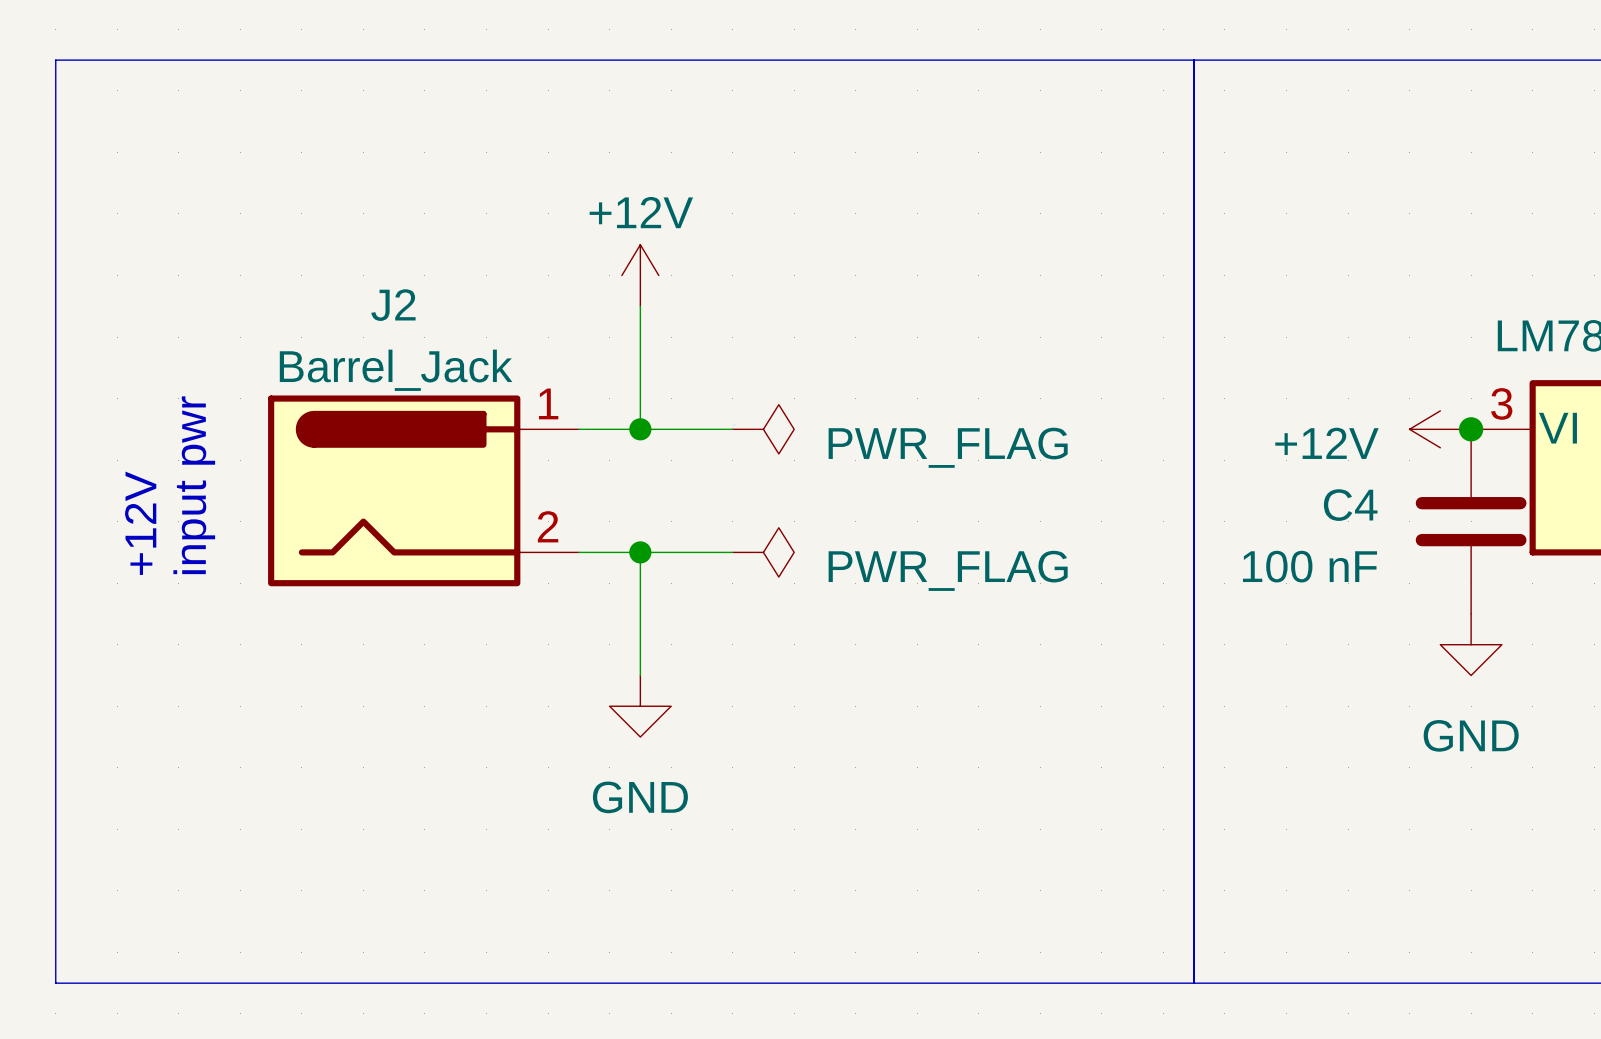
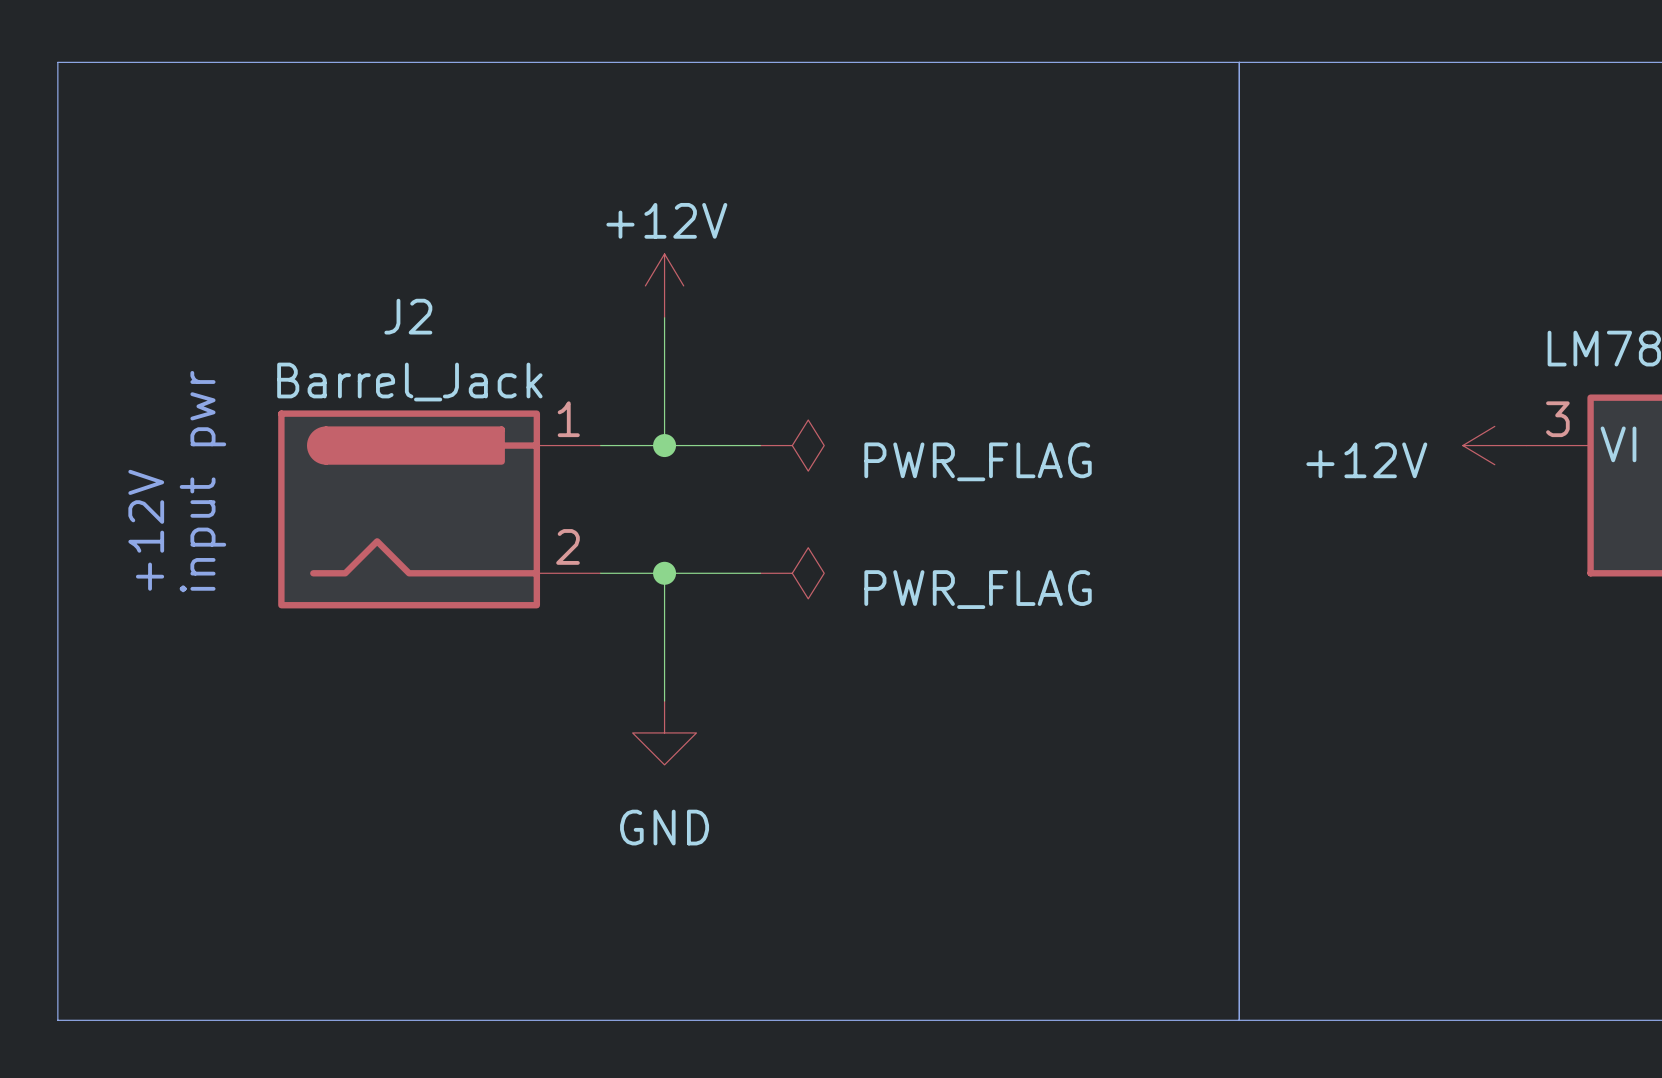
junction: (1471, 429) -> none
C4: 100 nF (1471, 521) -> none
power symbol: GND (1471, 644) -> none

